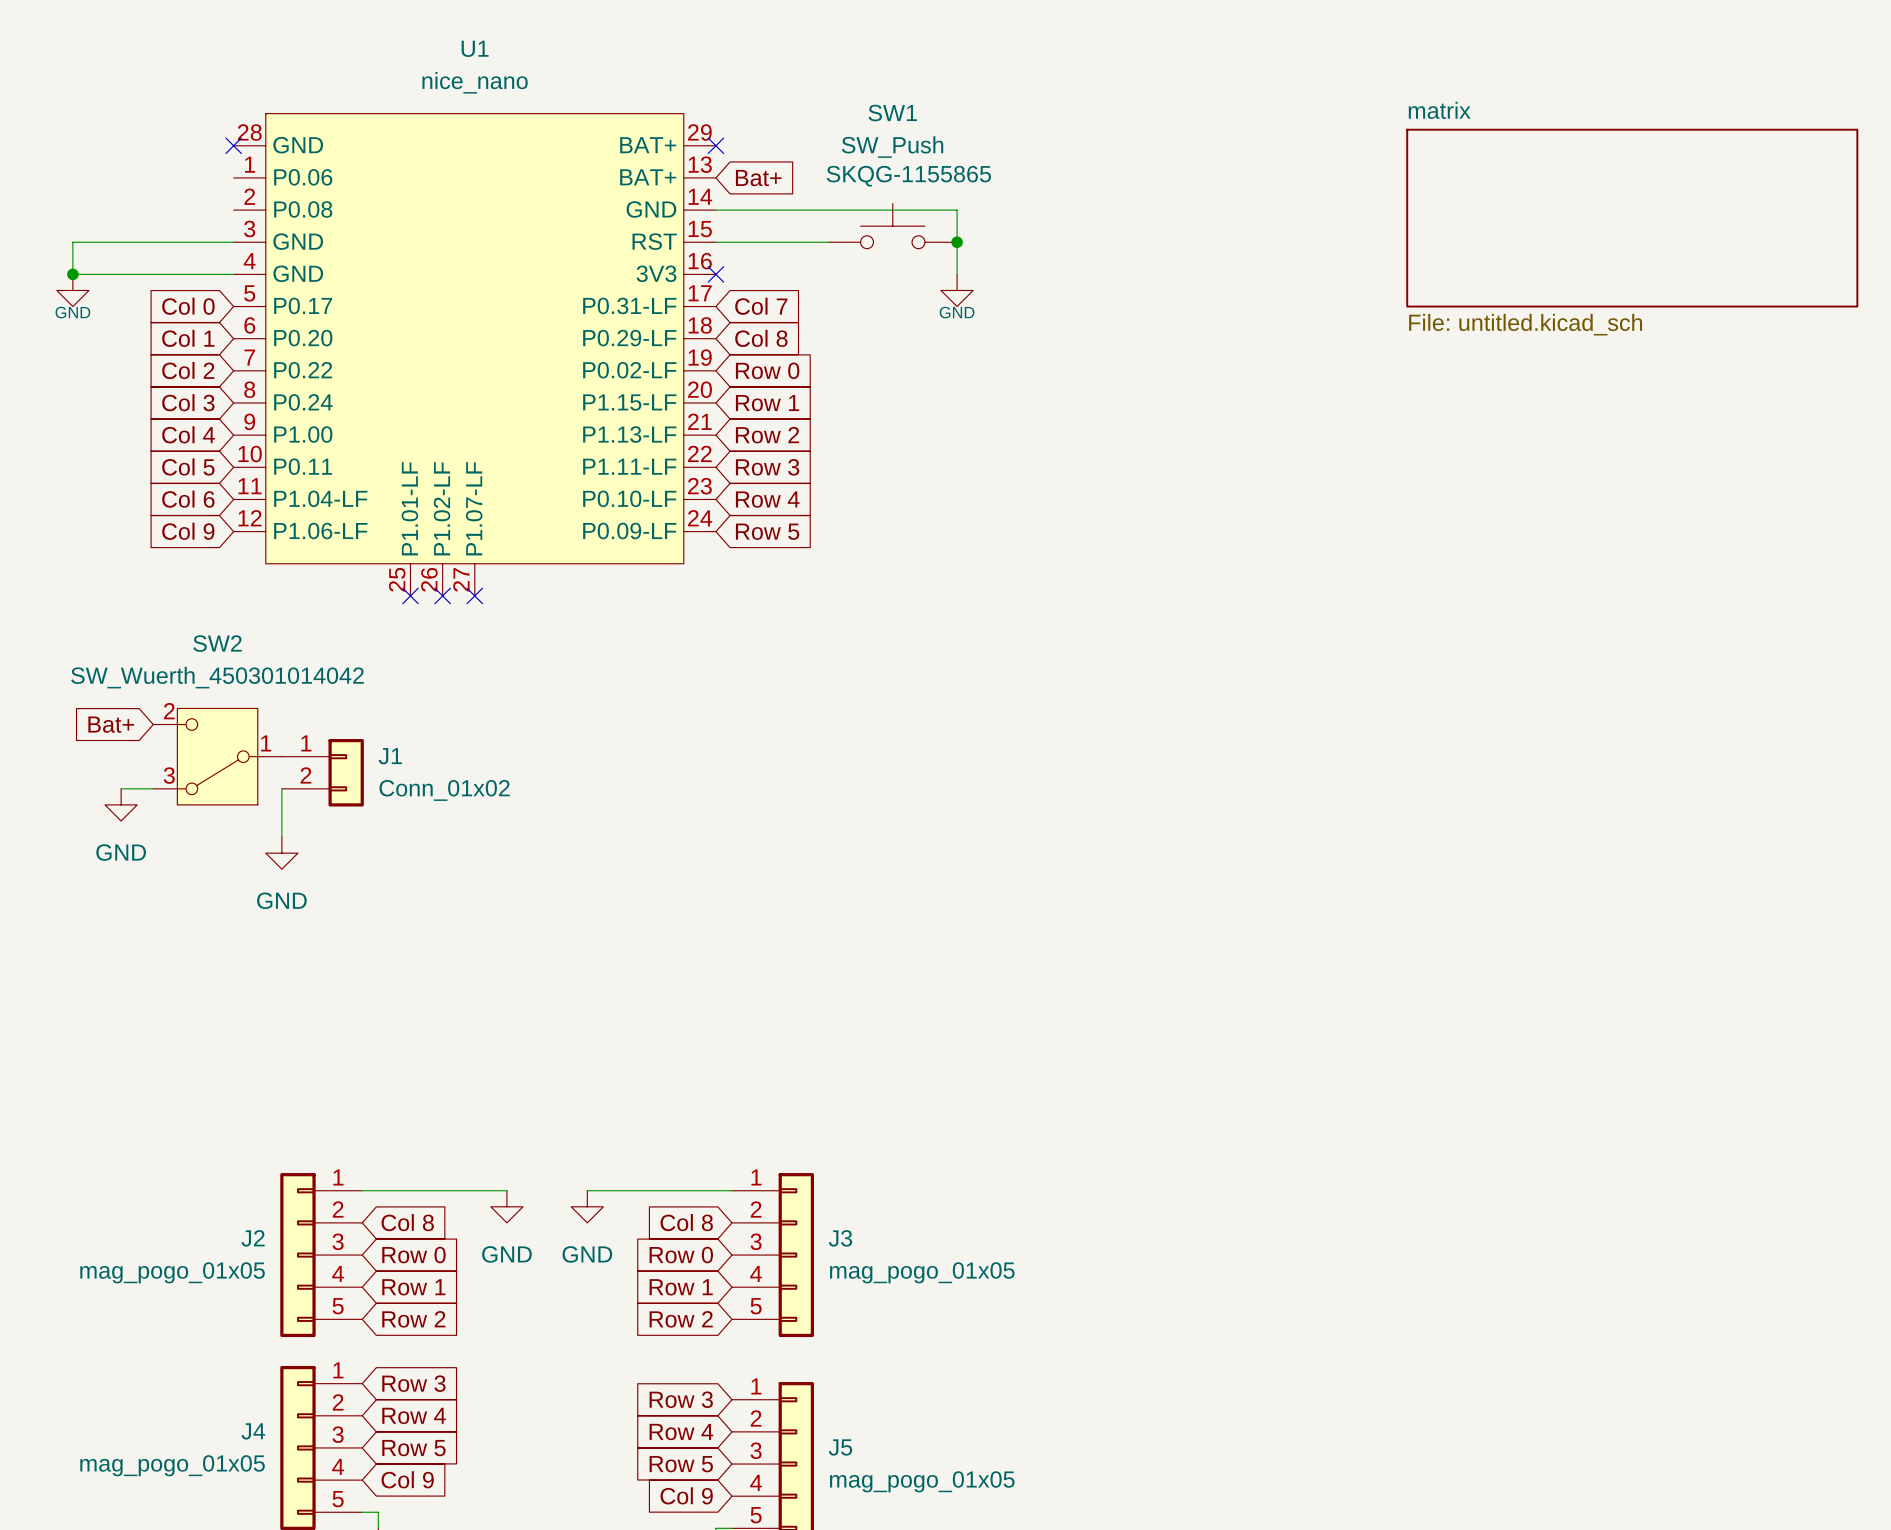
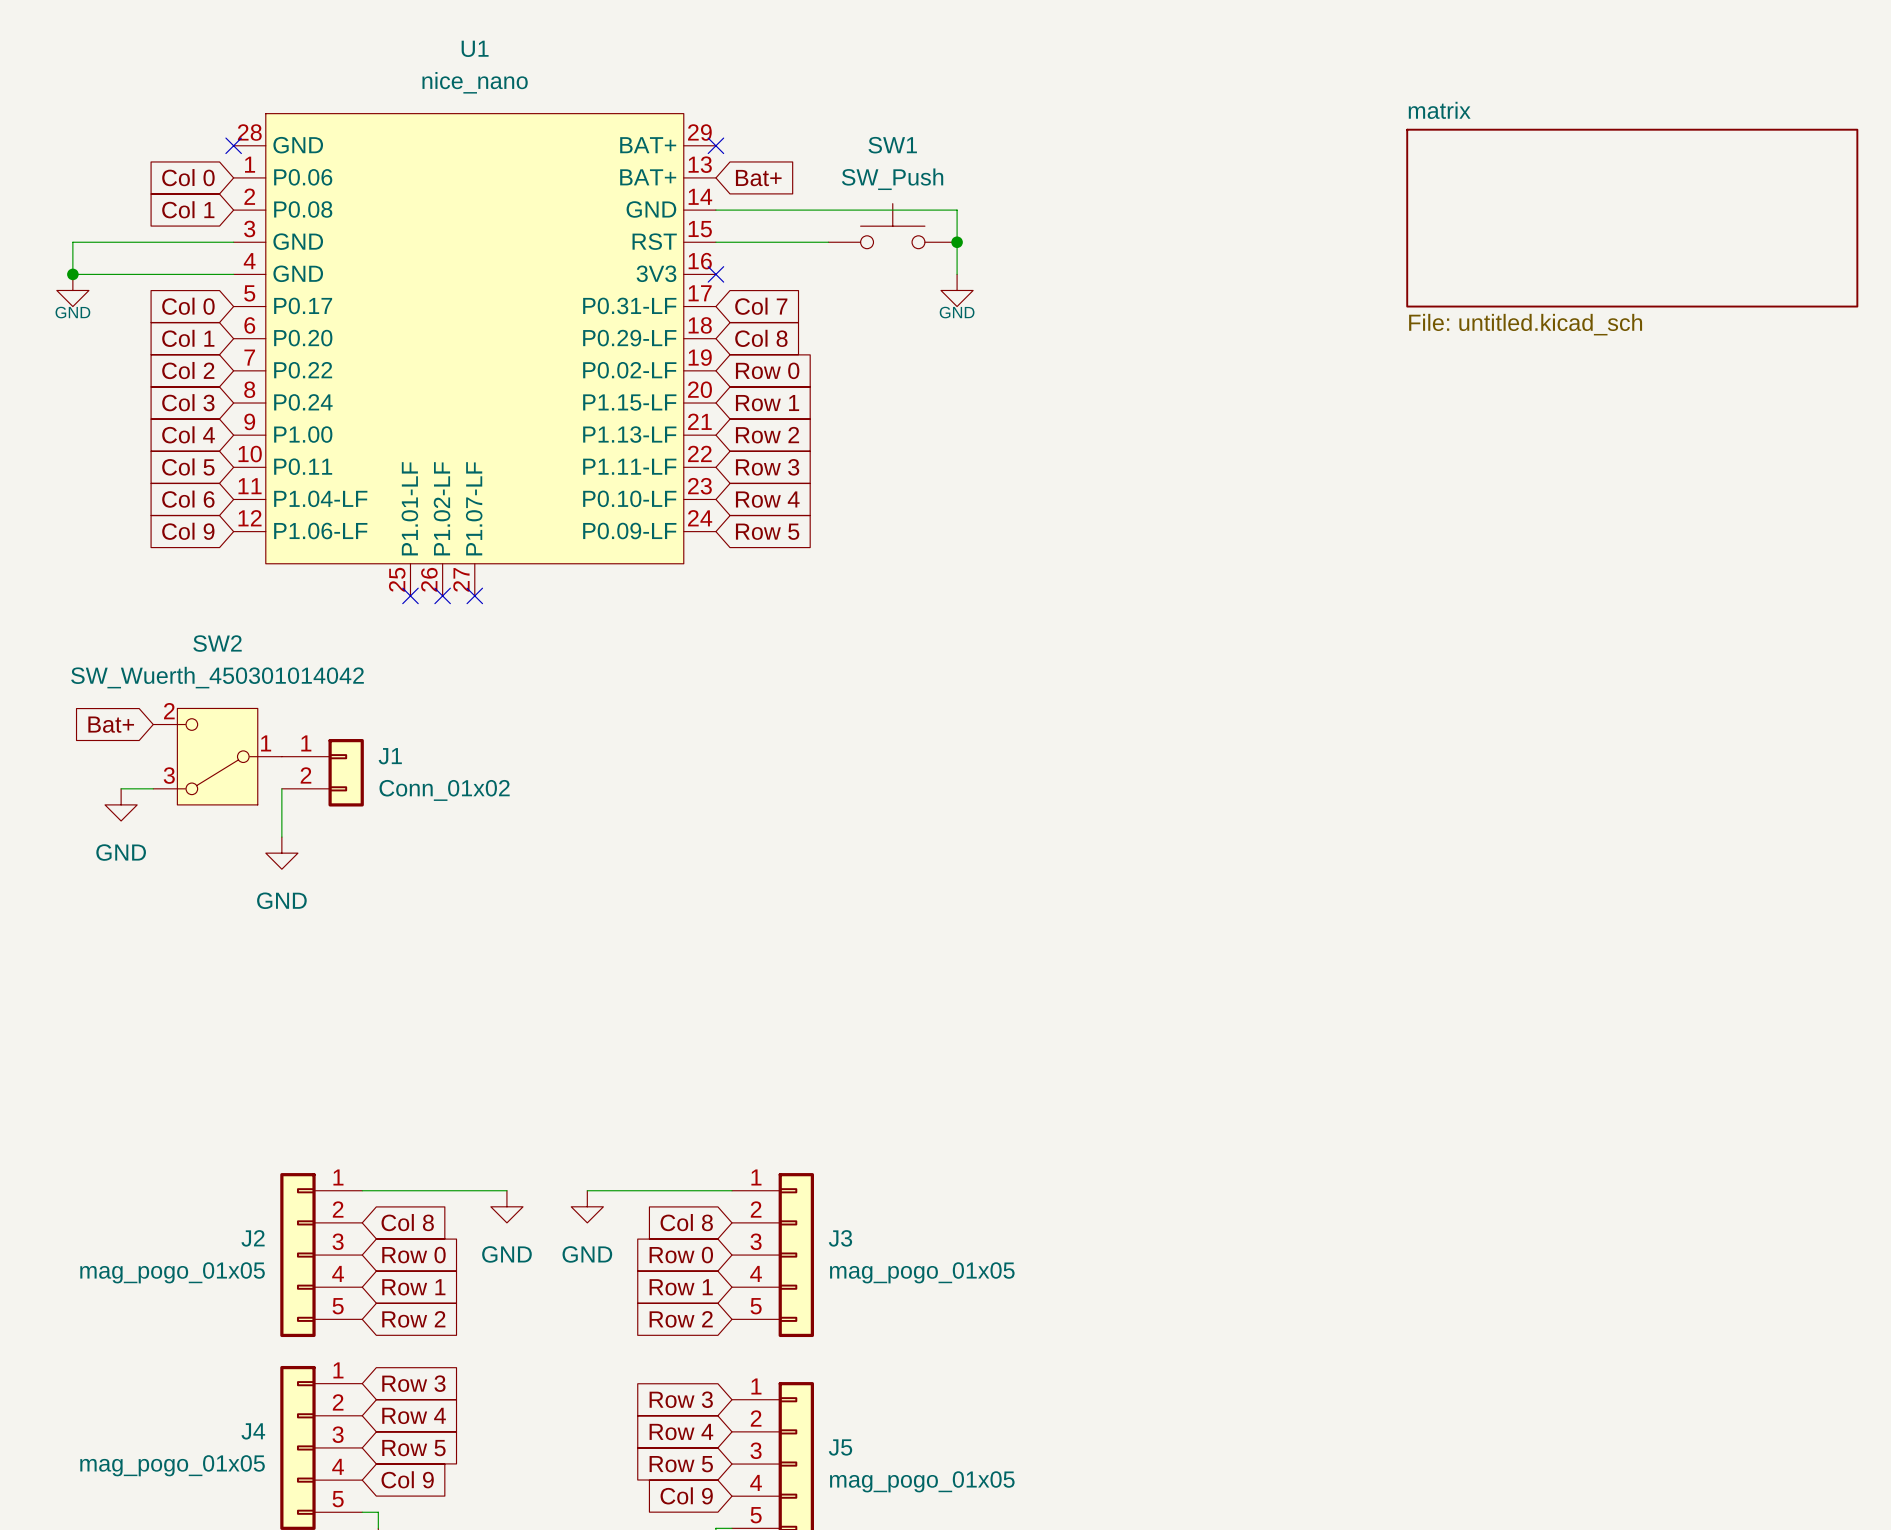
SW1 name position: SW1 (892, 113) -> SW1 (892, 145)
SW1 value position: SW_Push (892, 147) -> SW_Push (892, 179)
SW1 text: SKQG-1155865 (908, 176) -> none
global label: none -> Col 0 (188, 177)
global label: none -> Col 1 (188, 209)

